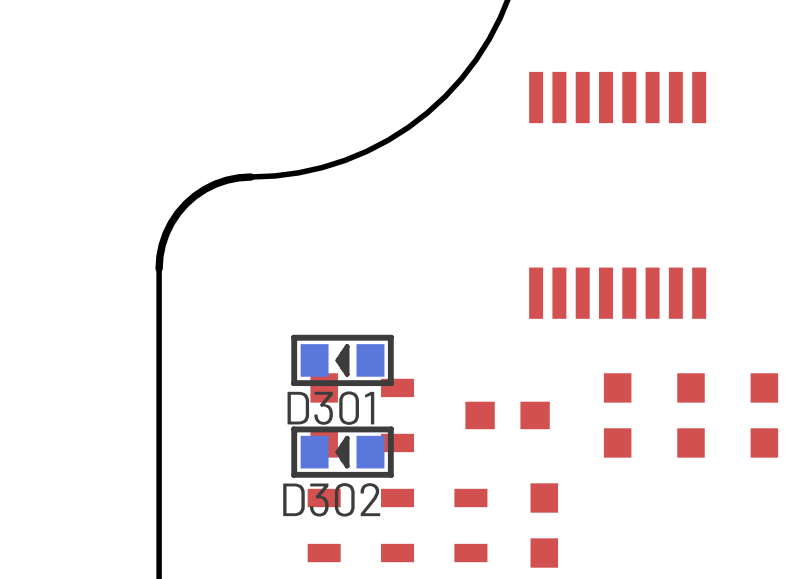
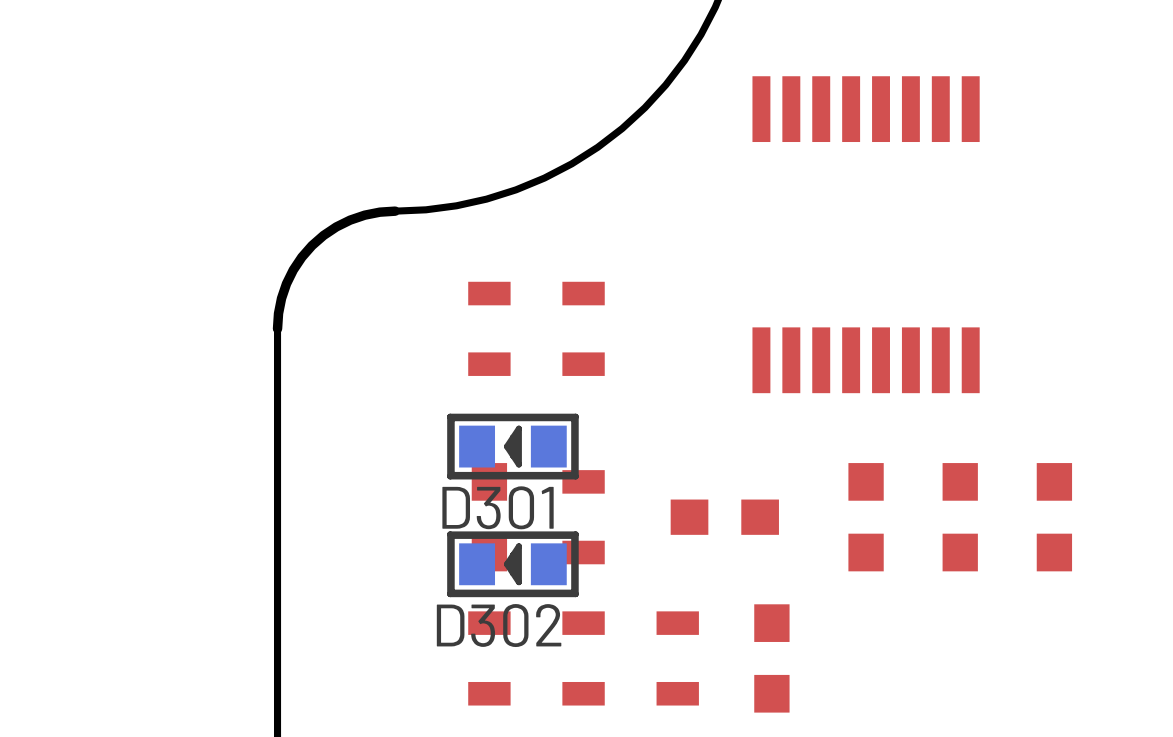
part: none -> (489, 328)
part: none -> (583, 328)

